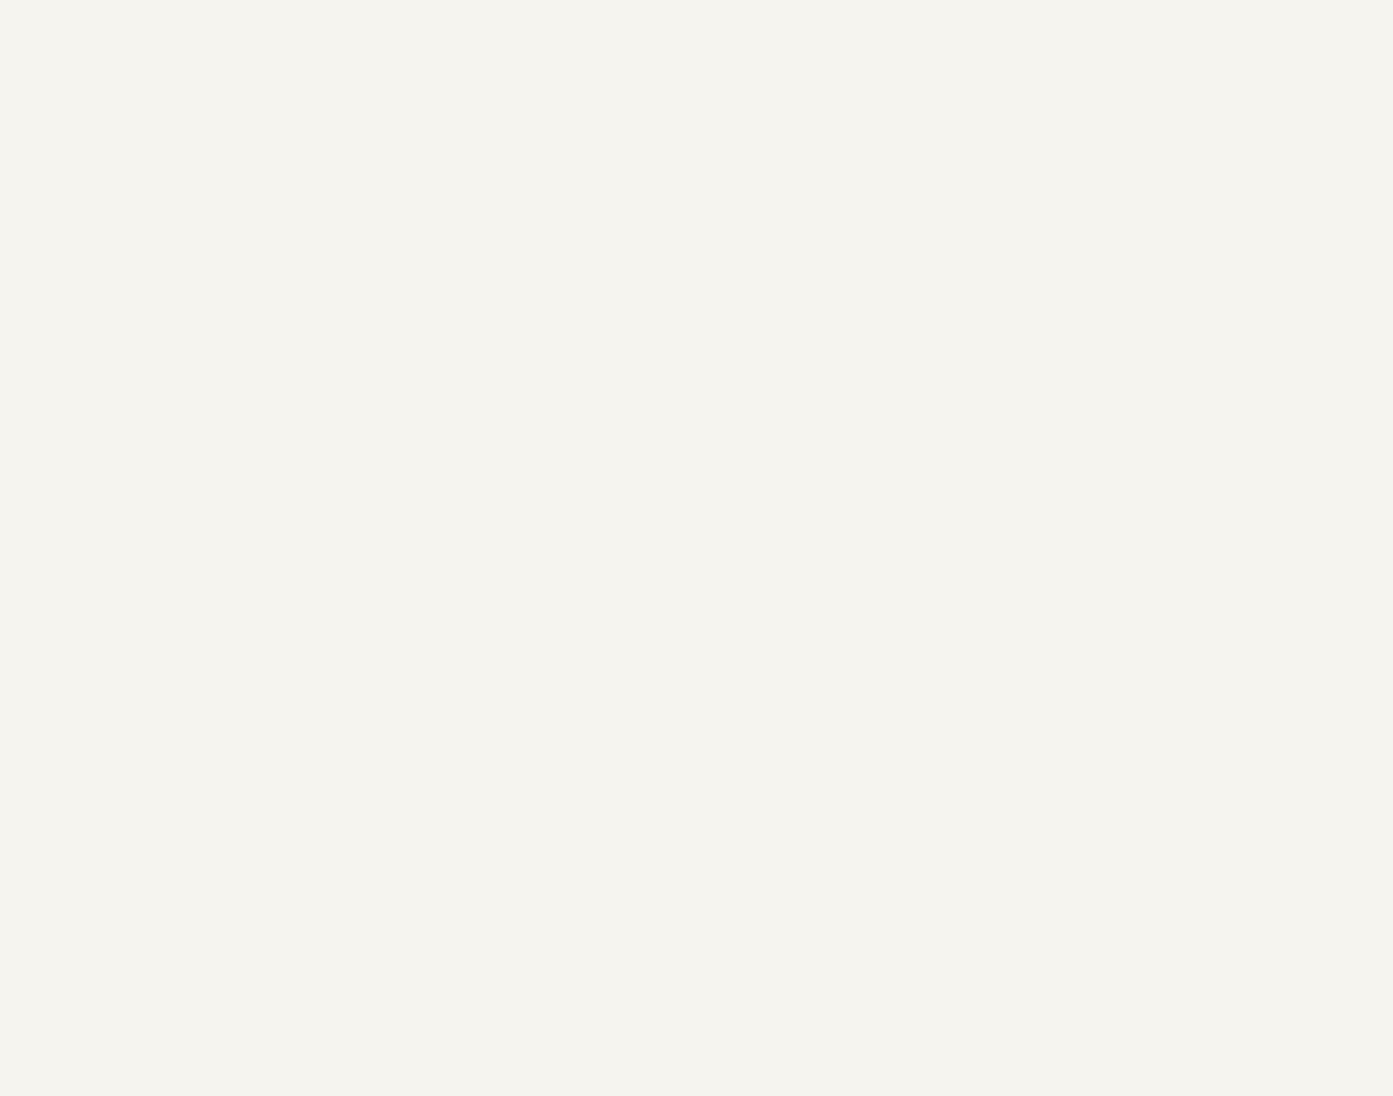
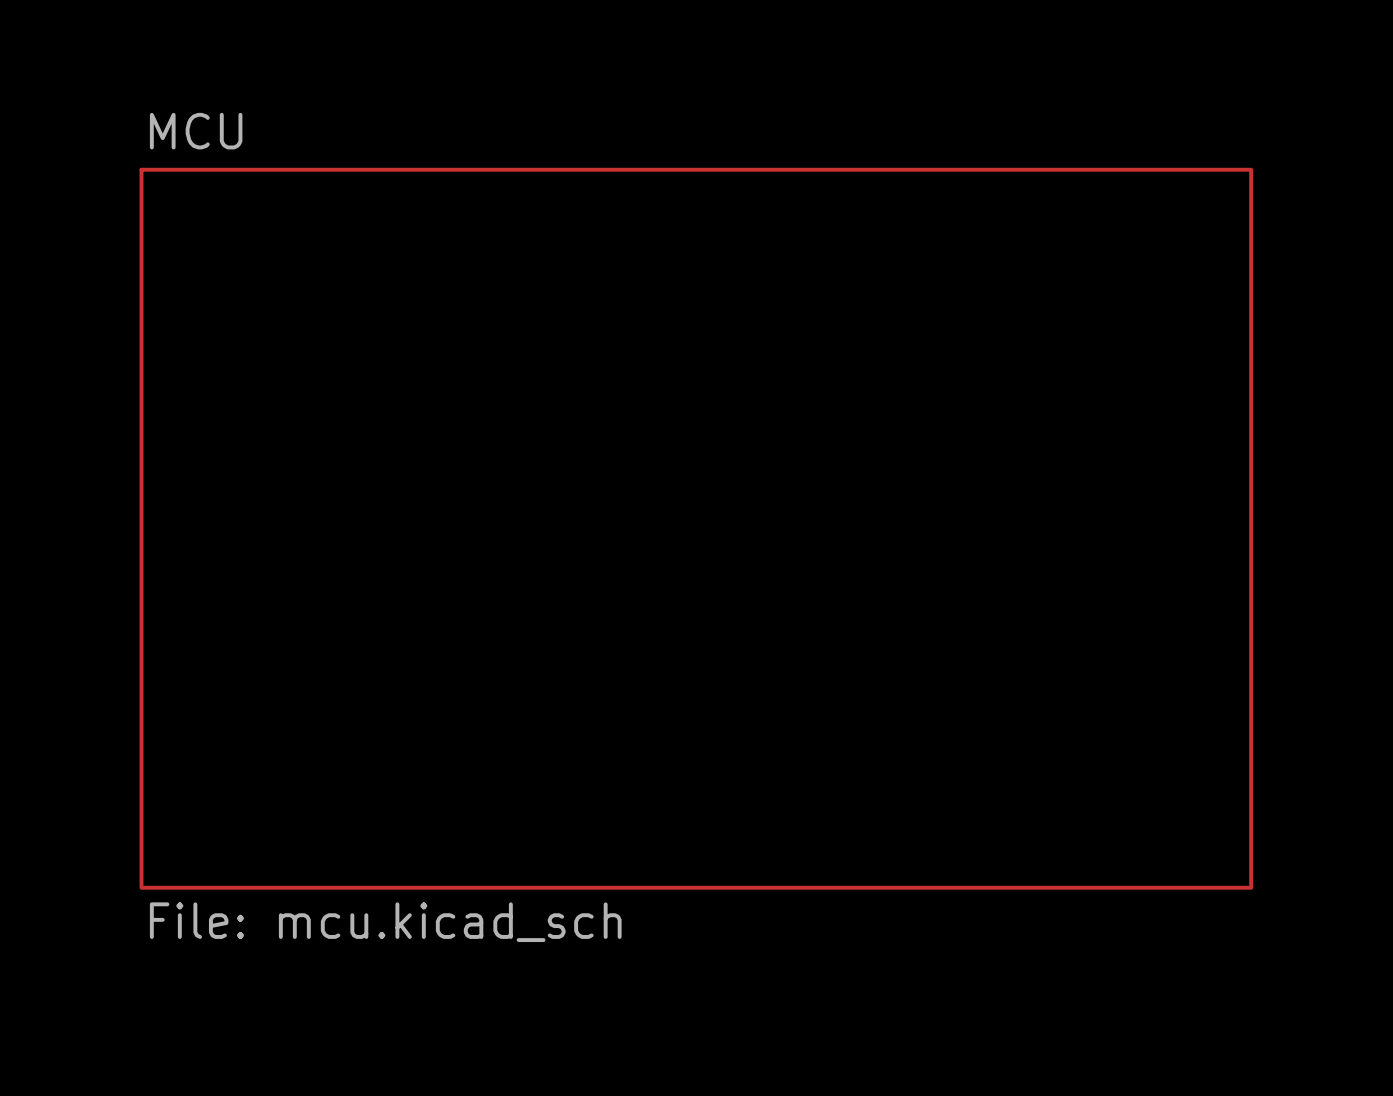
sheet MCU: none -> File: mcu.kicad_sch (696, 528)

